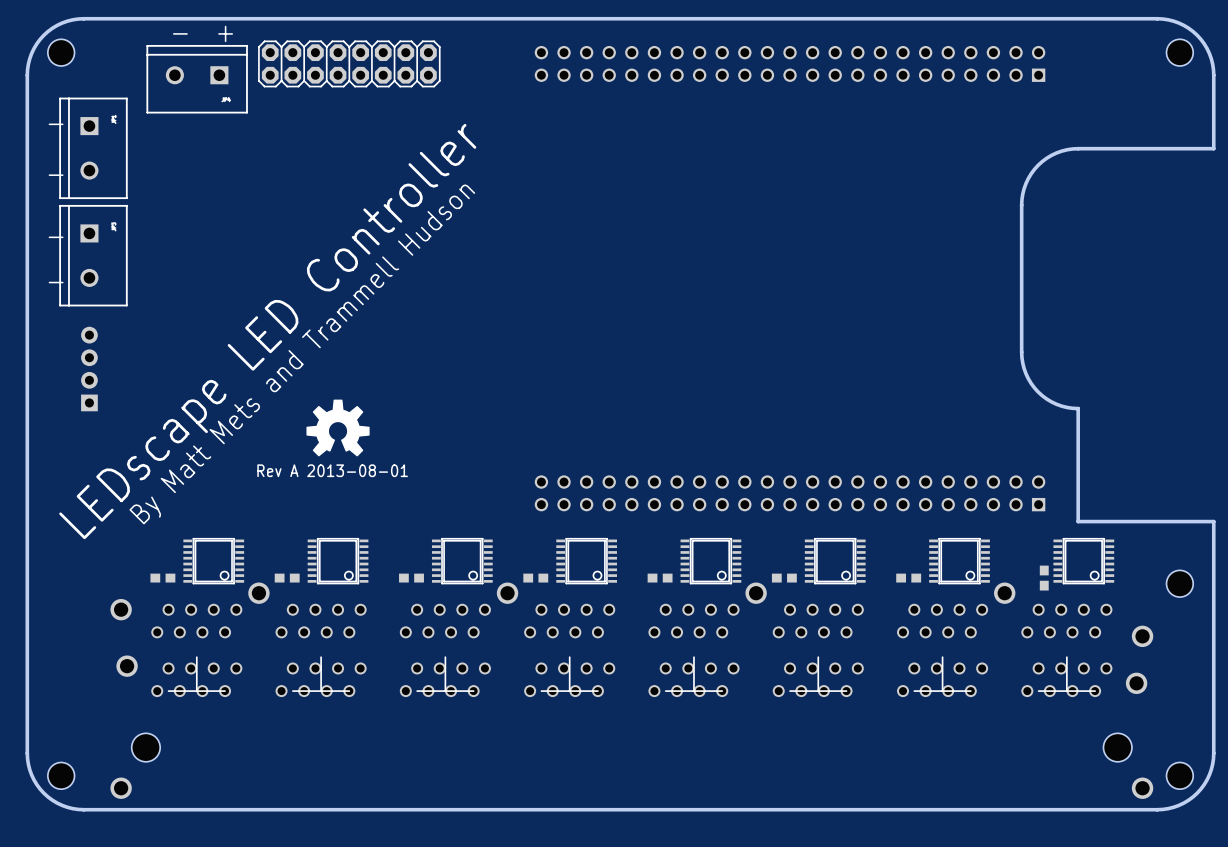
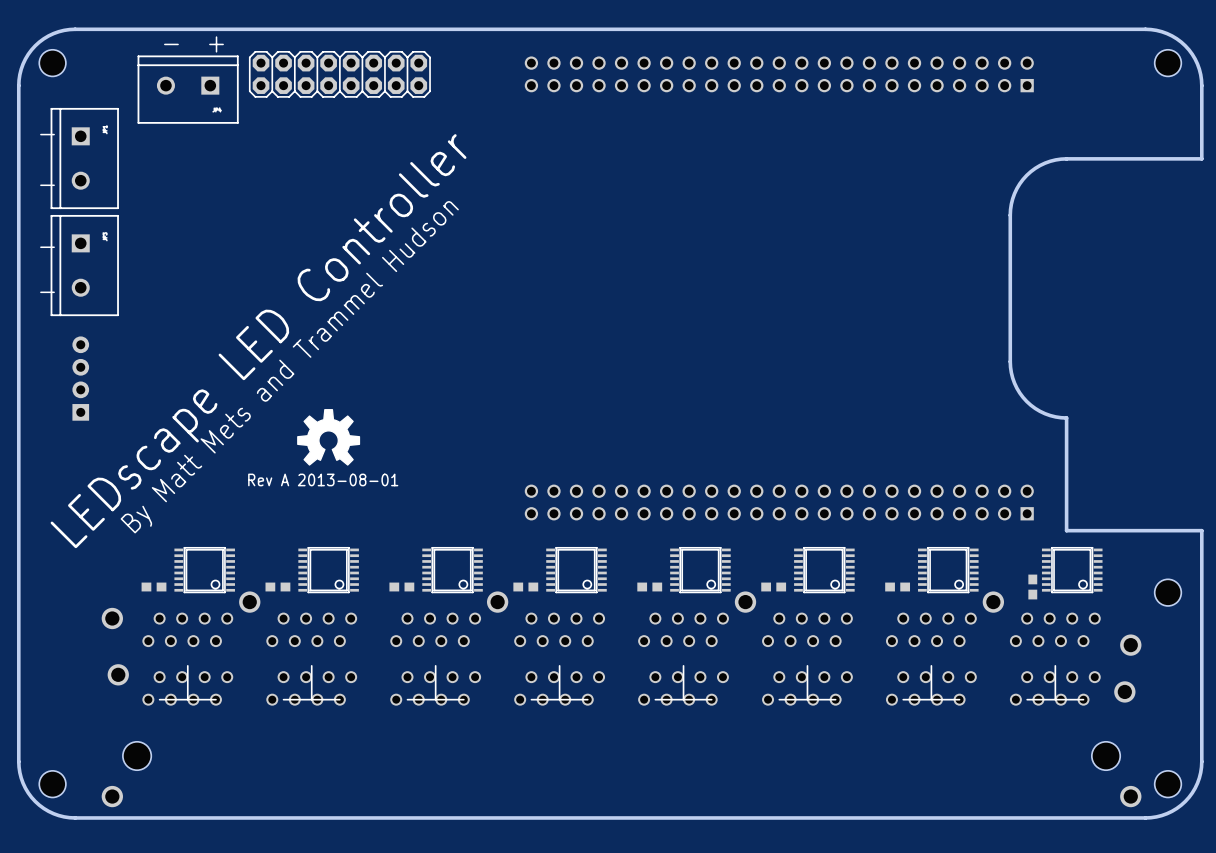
text: By Matt Mets and Trammell Hudson (302, 354) -> By Matt Mets and Trammel Hudson (289, 367)

